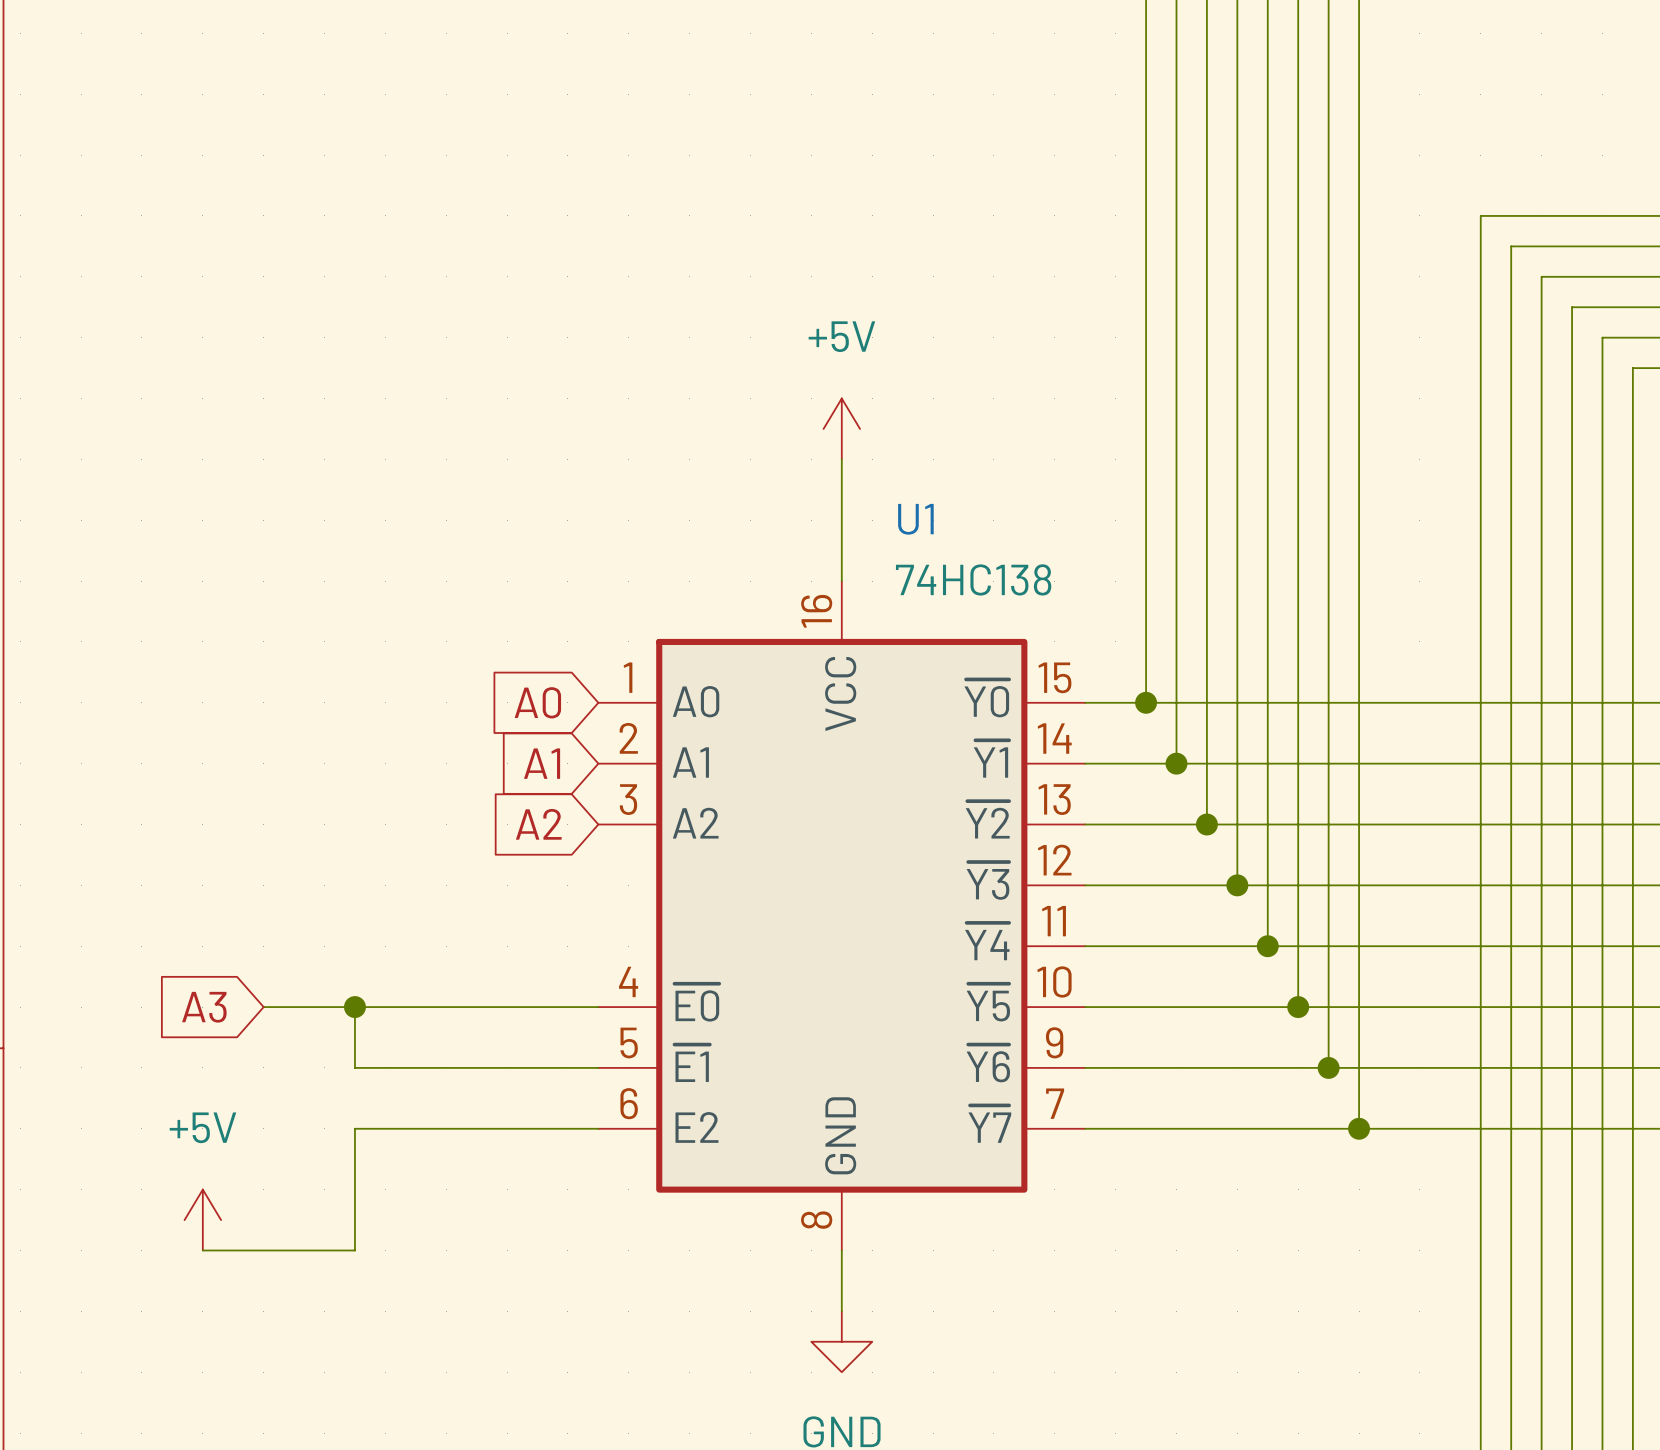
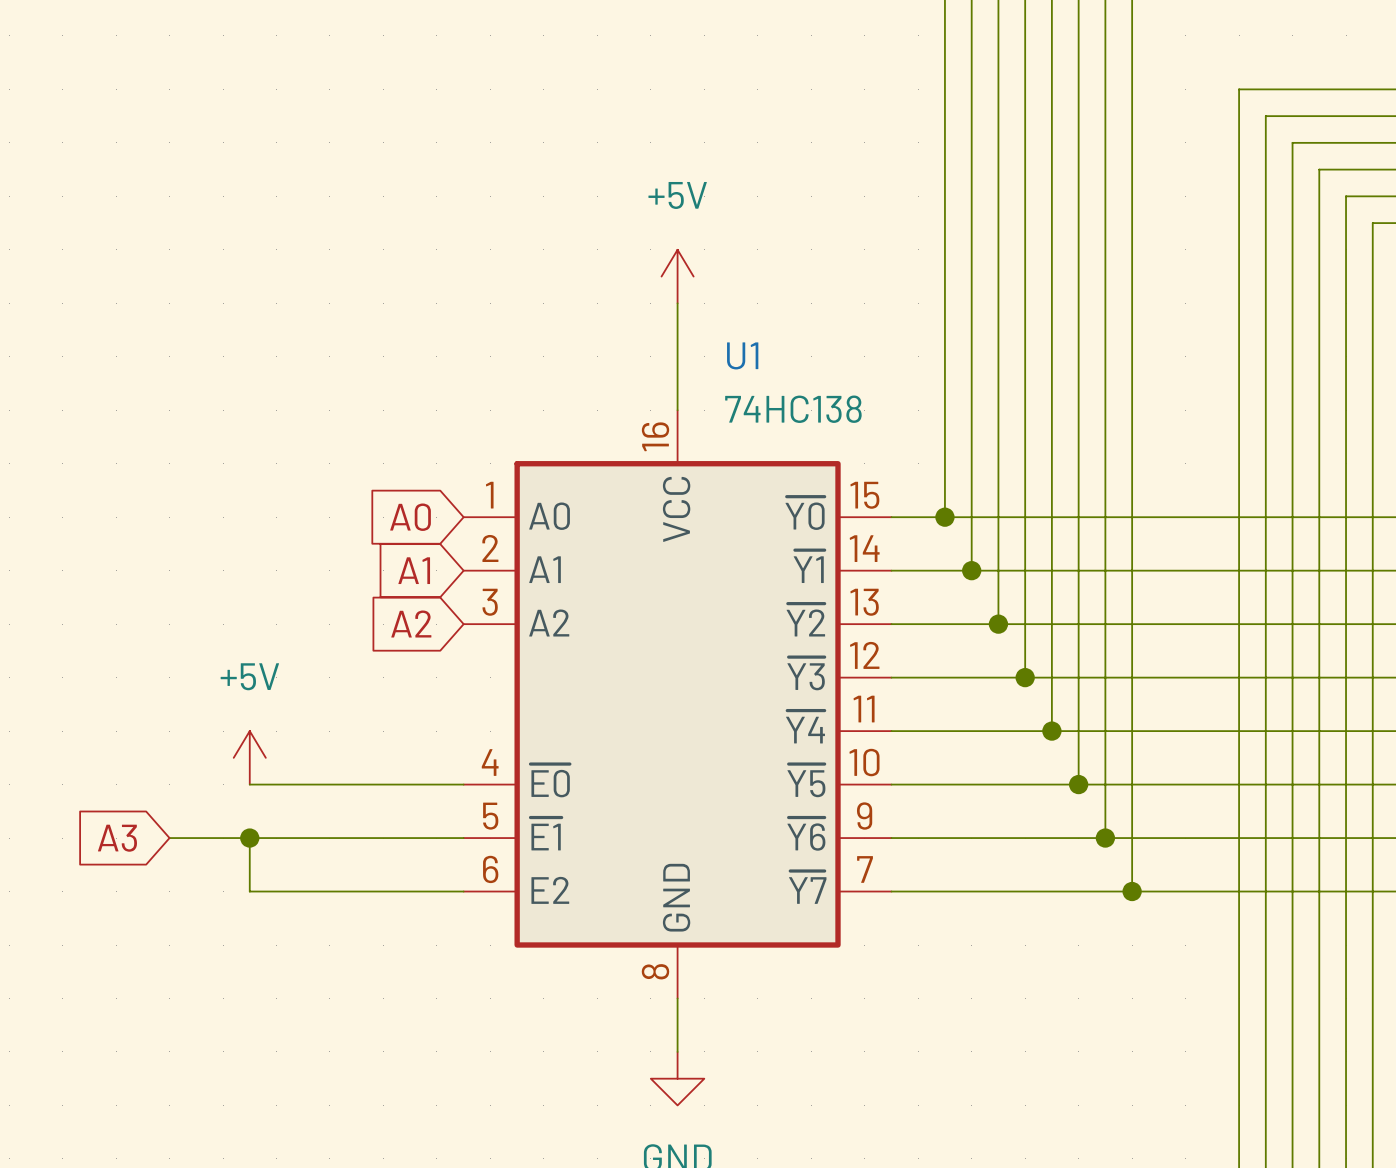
global label position: A3 (204, 1007) -> A3 (117, 838)
wire: (263, 1007) (354, 1007) (354, 1067) -> none
junction position: (354, 1007) -> (249, 838)
wire: (354, 1128) (354, 1250) (202, 1250) -> (249, 891) (249, 838) (169, 838)
power symbol position: +5V (202, 1220) -> +5V (249, 757)

